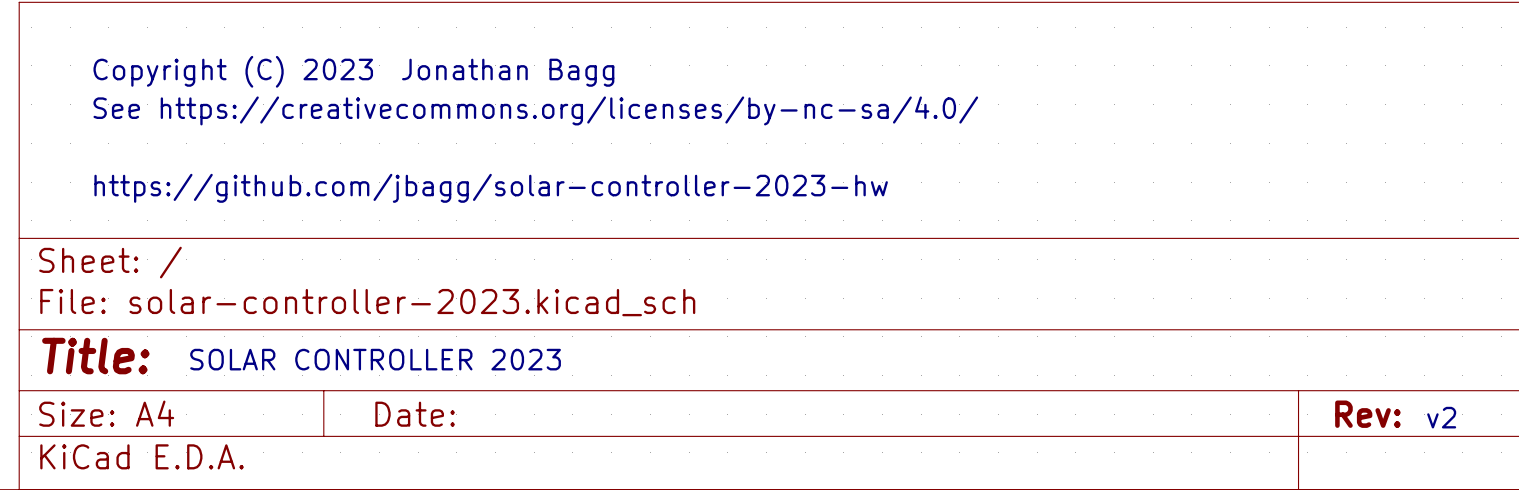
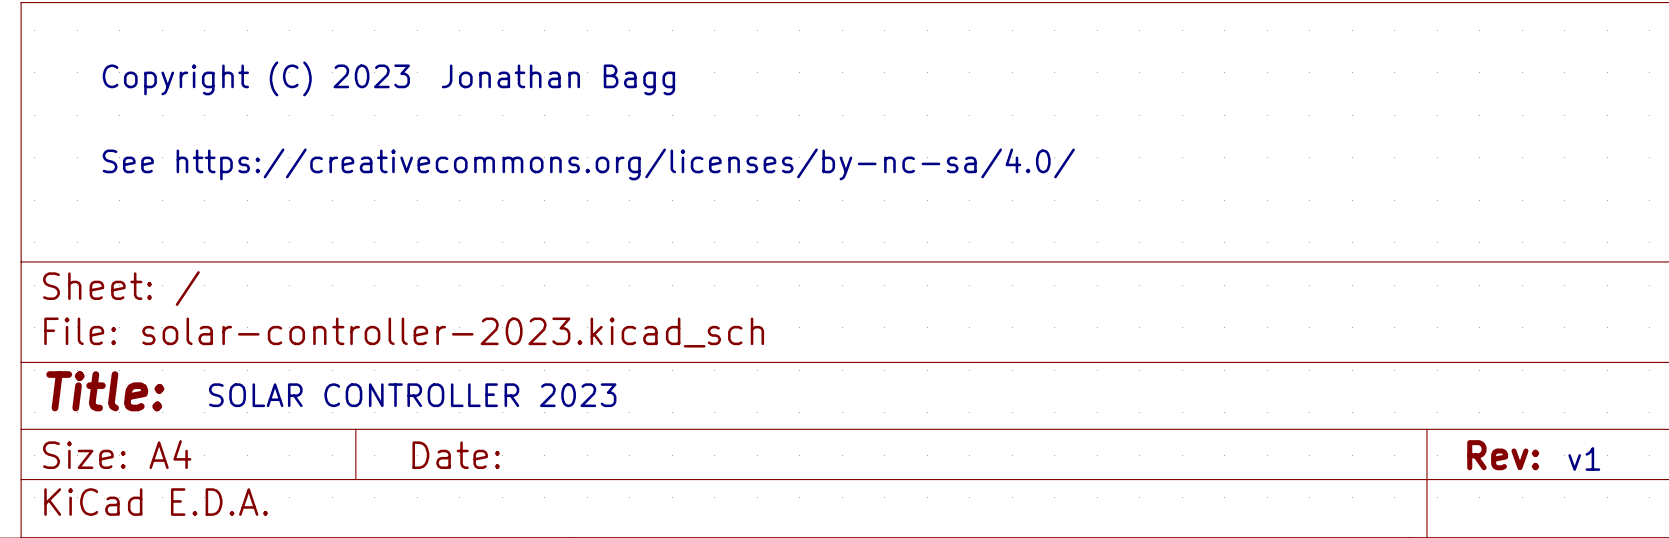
text position: See https://creativecommons.org/licenses/by-nc-sa/4.0/ (535, 110) -> See https://creativecommons.org/licenses/by-nc-sa/4.0/ (588, 164)
text: https://github.com/jbagg/solar-controller-2023-hw (491, 188) -> none
text: v2 (1441, 417) -> v1 (1584, 458)

